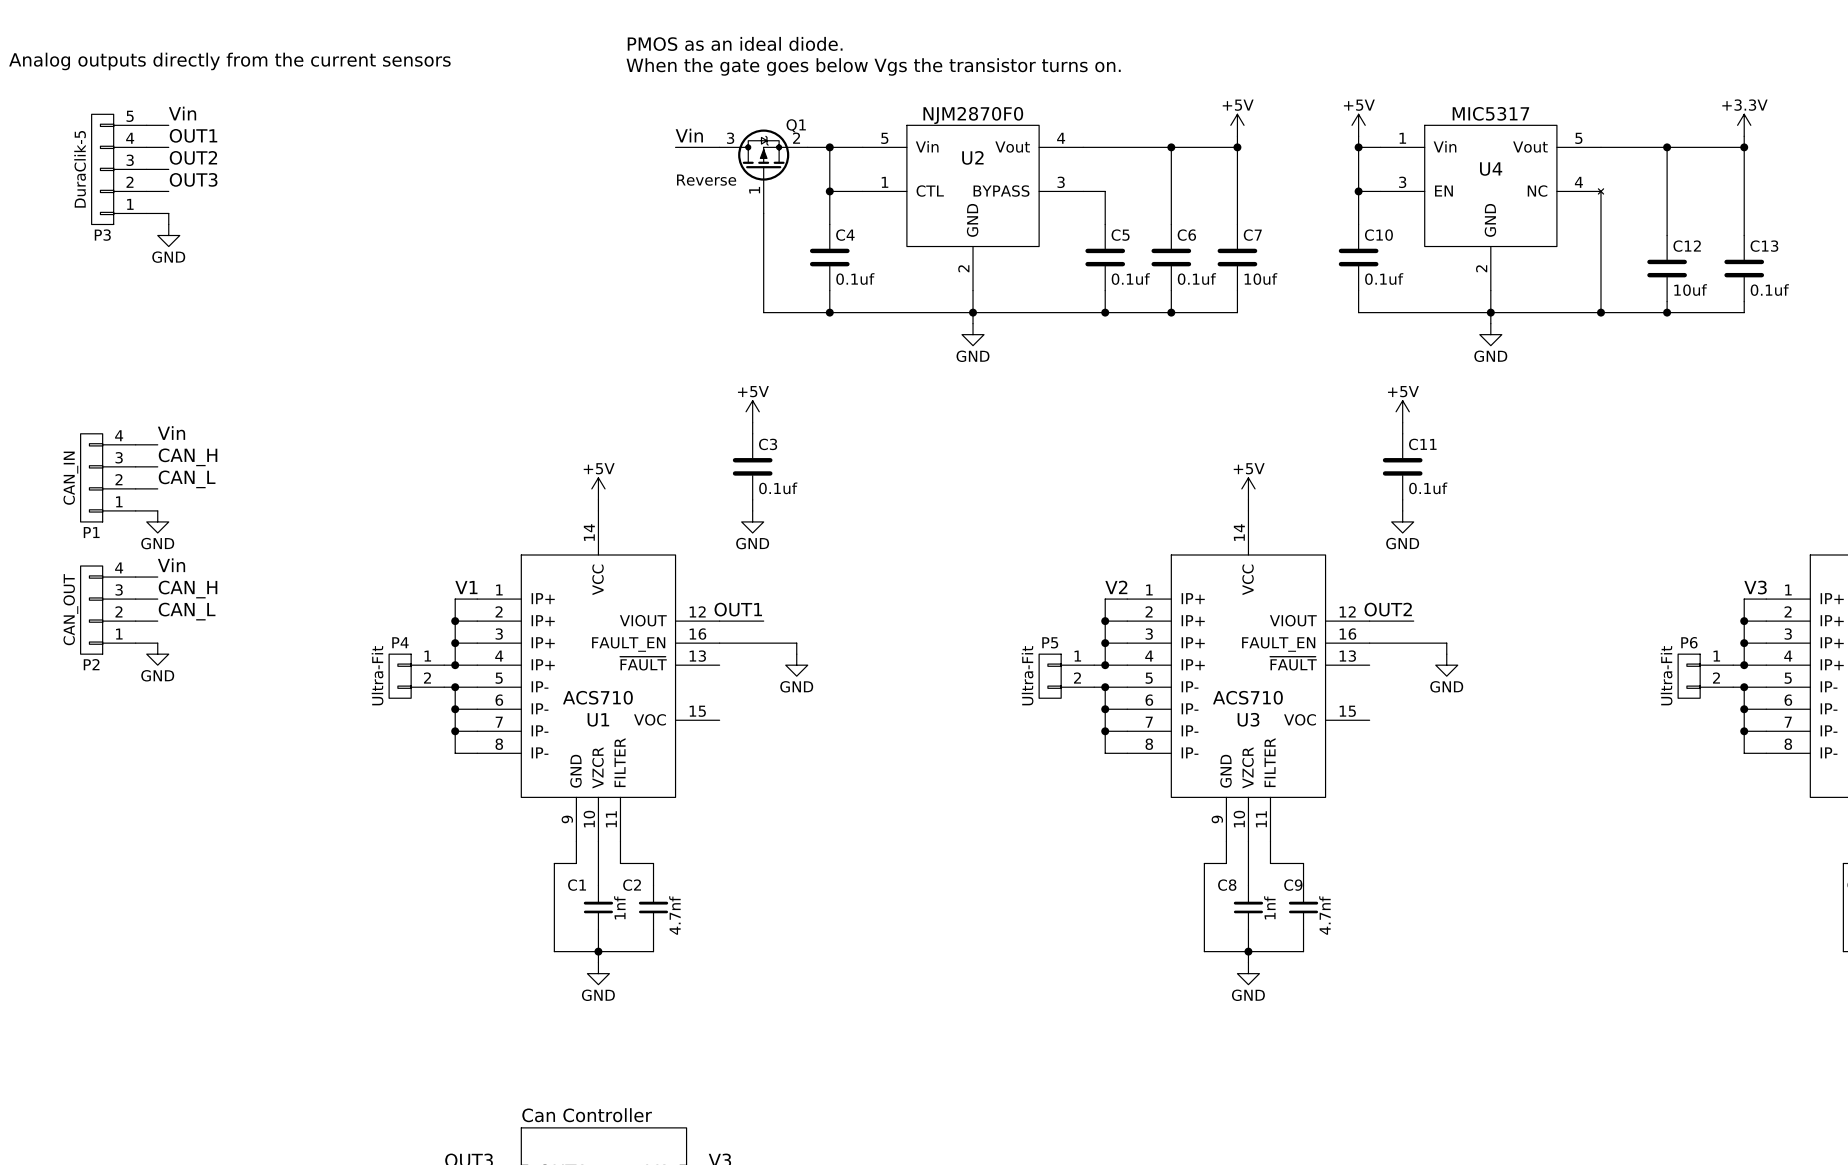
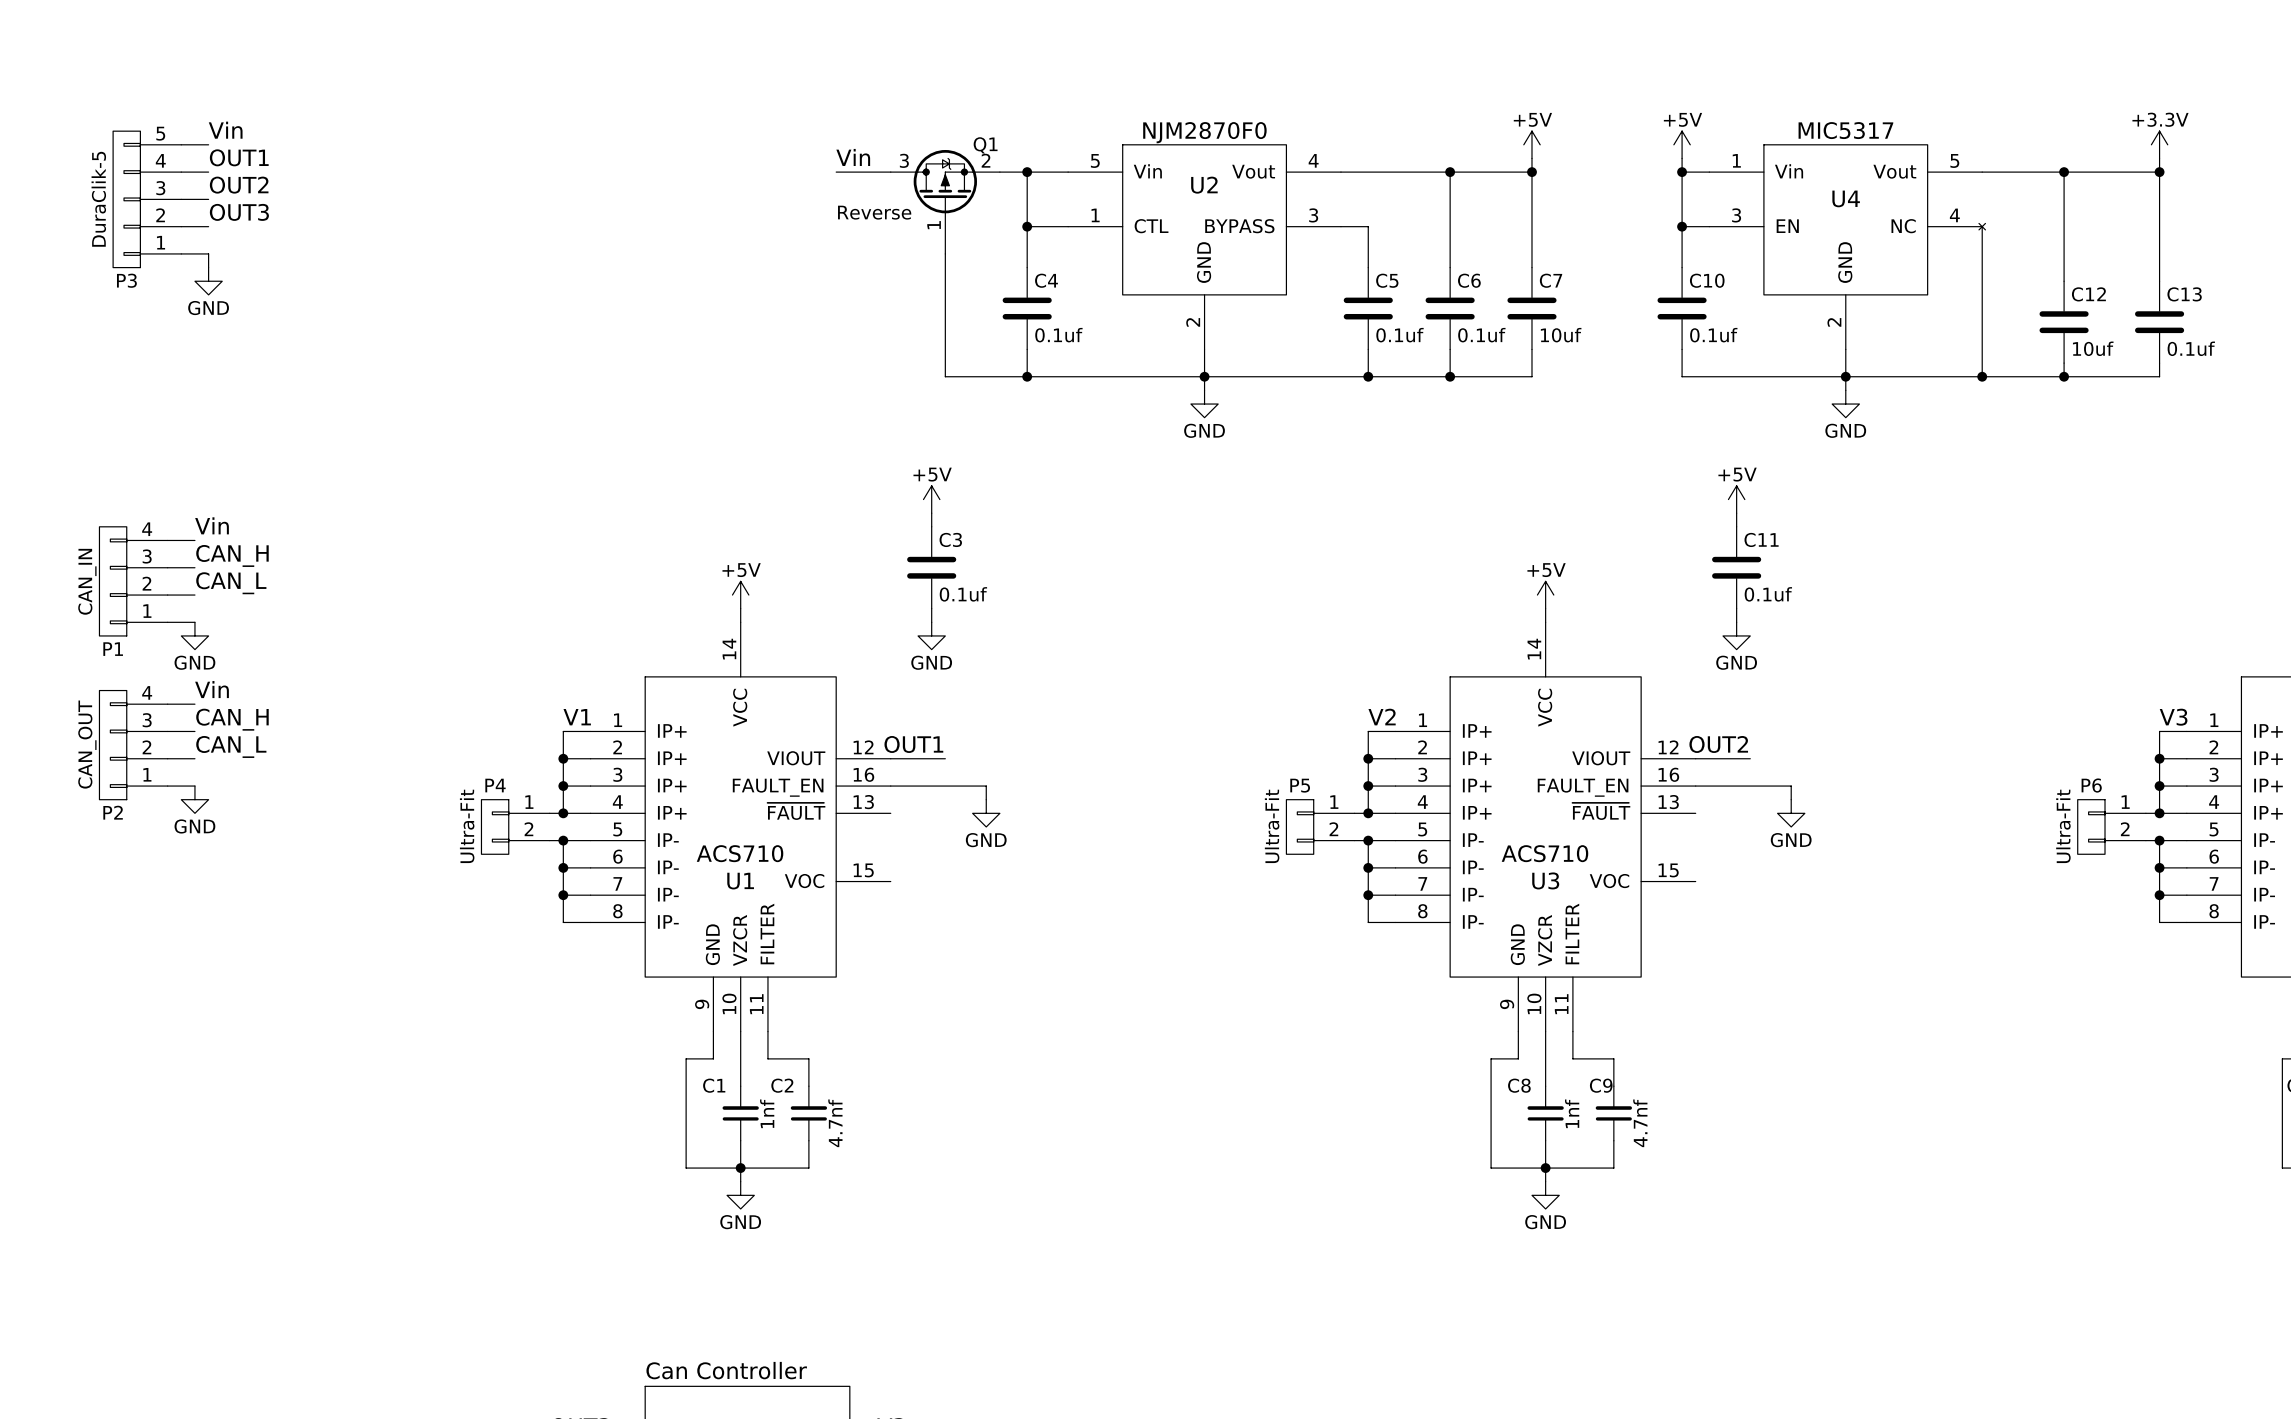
text: PMOS as an ideal diode. (735, 43) -> none
text: Analog outputs directly from the current sensors (229, 61) -> none
text: When the gate goes below Vgs the transistor turns on. (873, 66) -> none

